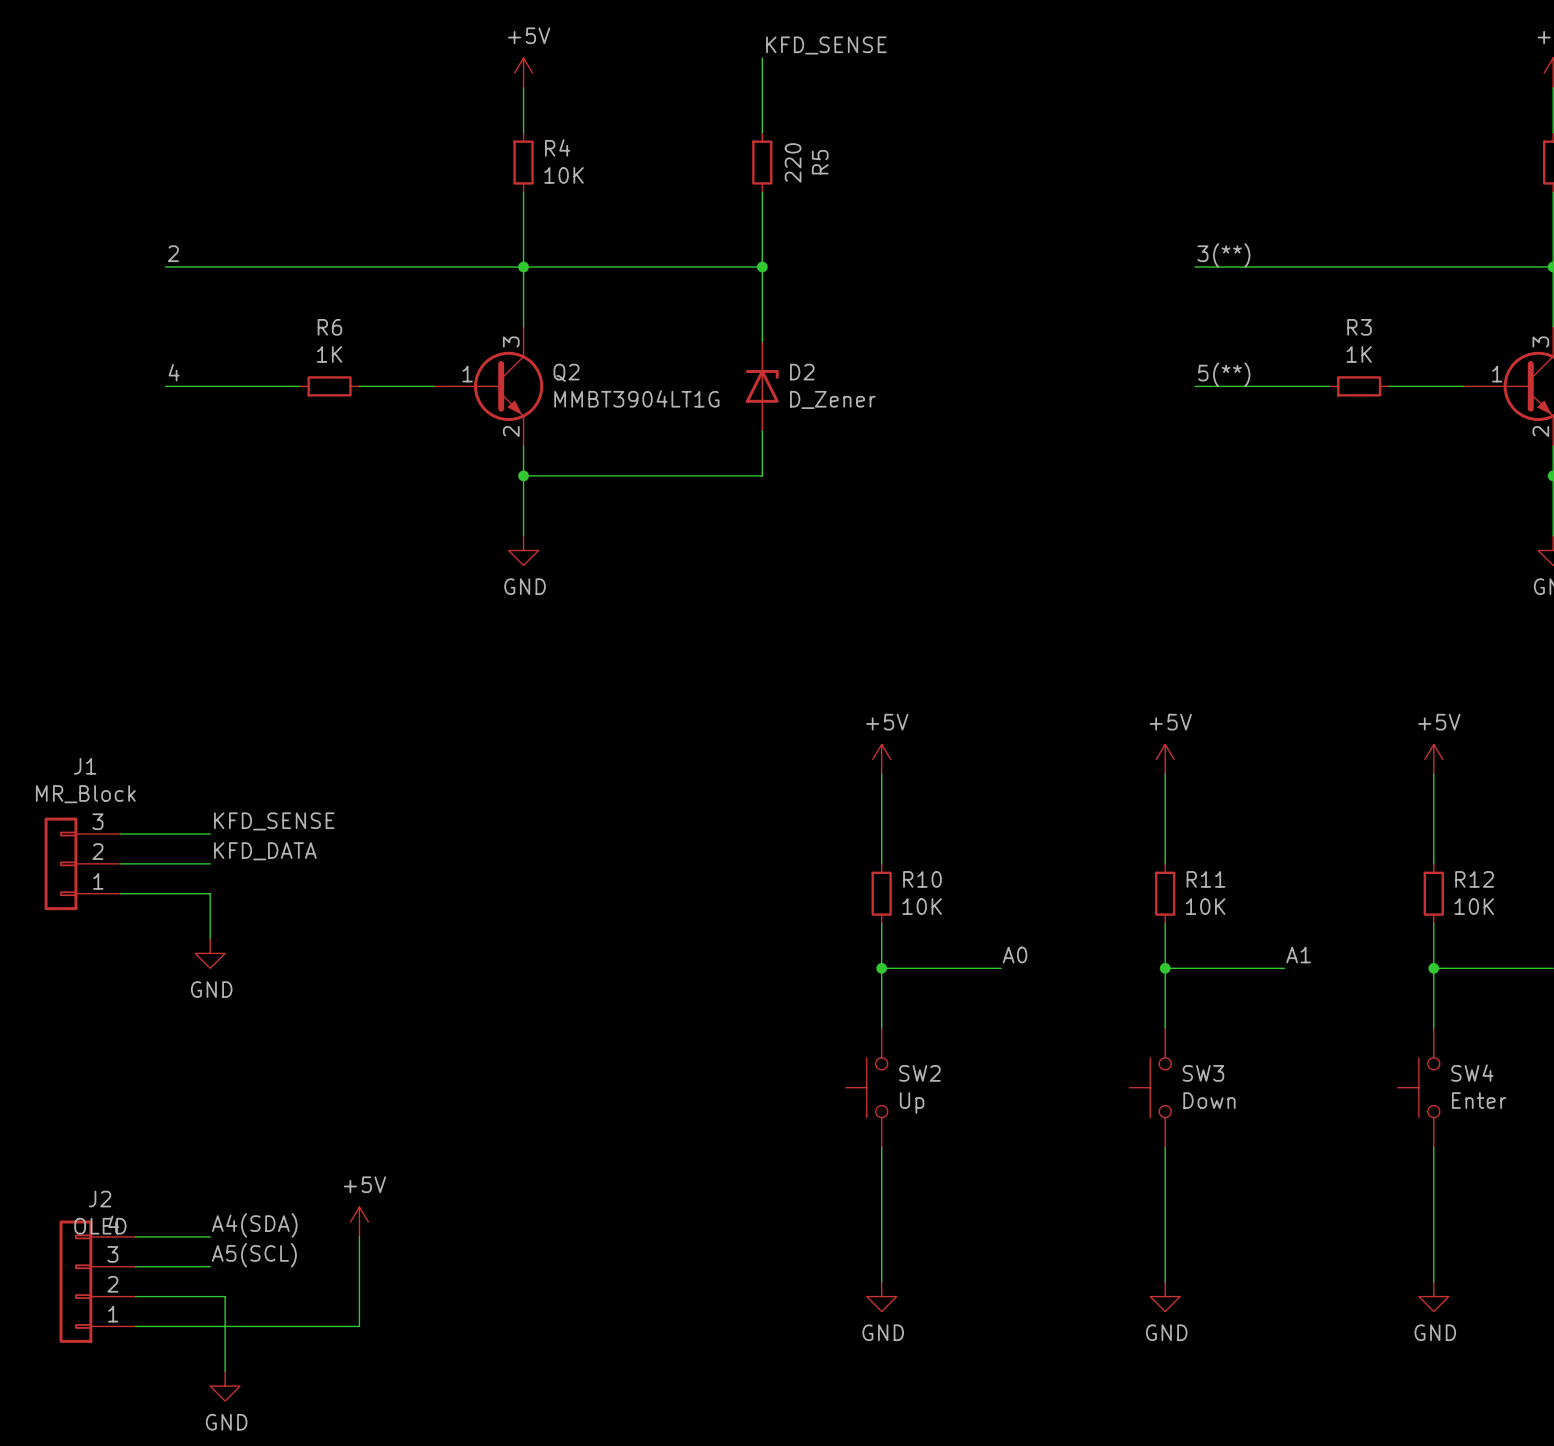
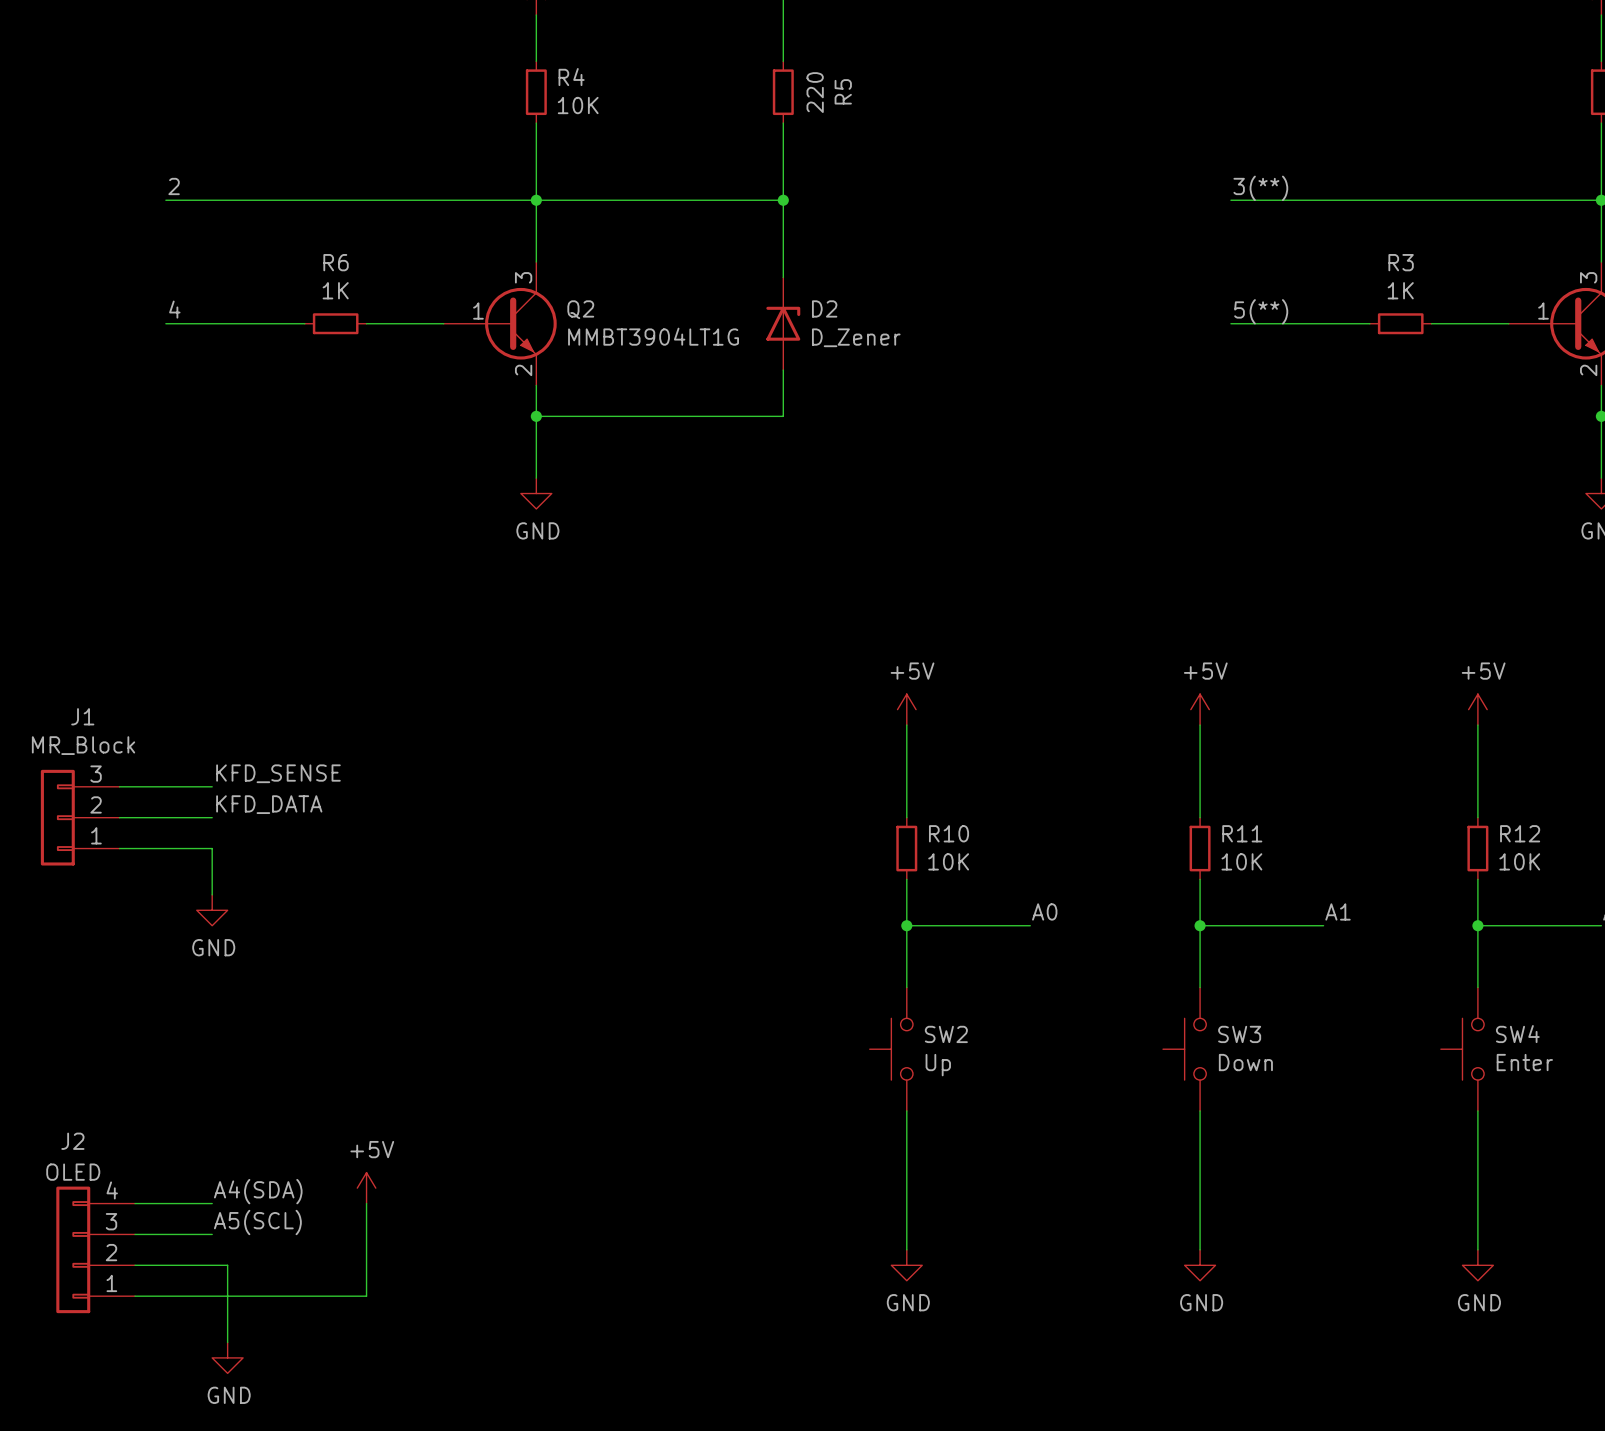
J2 name position: J2 (100, 1199) -> J2 (72, 1141)
J2 value position: OLED (100, 1226) -> OLED (73, 1172)

